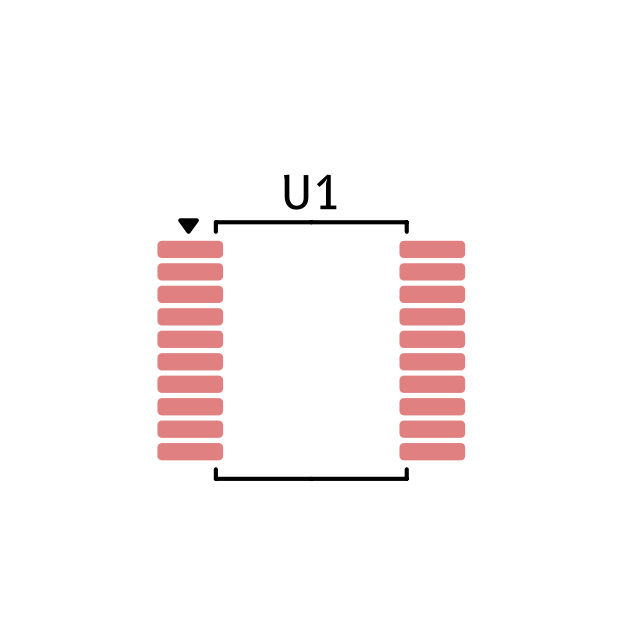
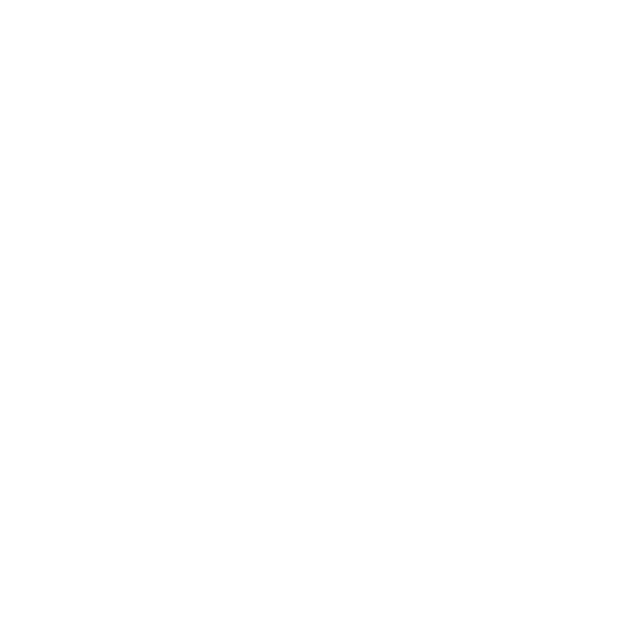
U1: (311, 349) -> none

